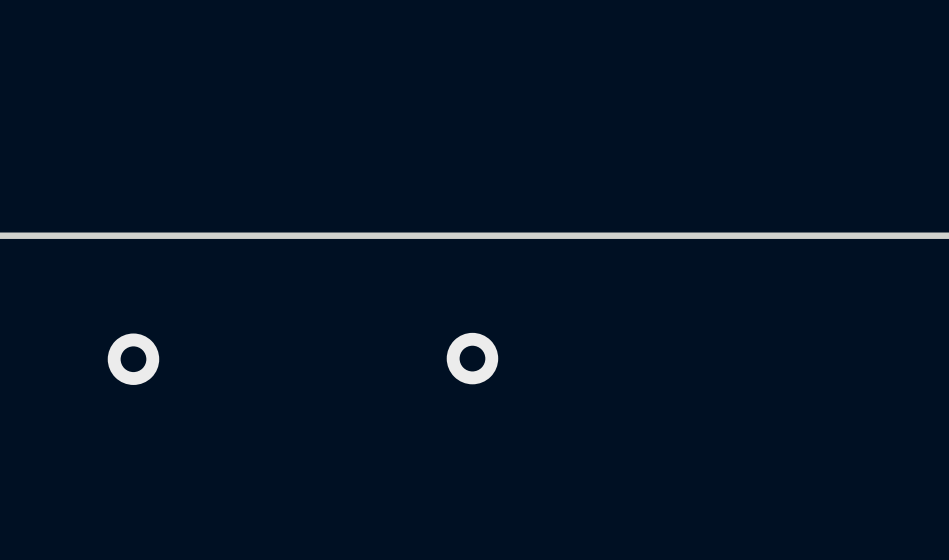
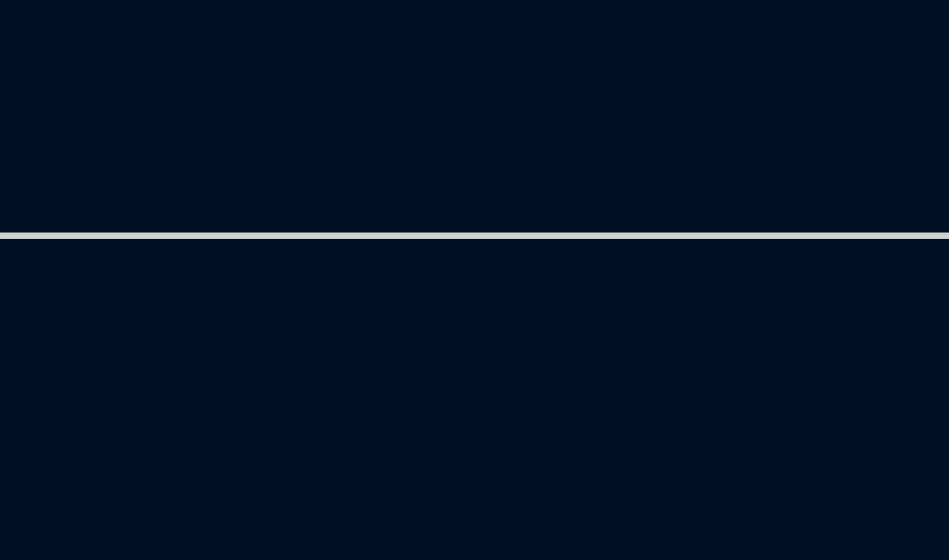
via: (472, 358) -> none
via: (133, 359) -> none

